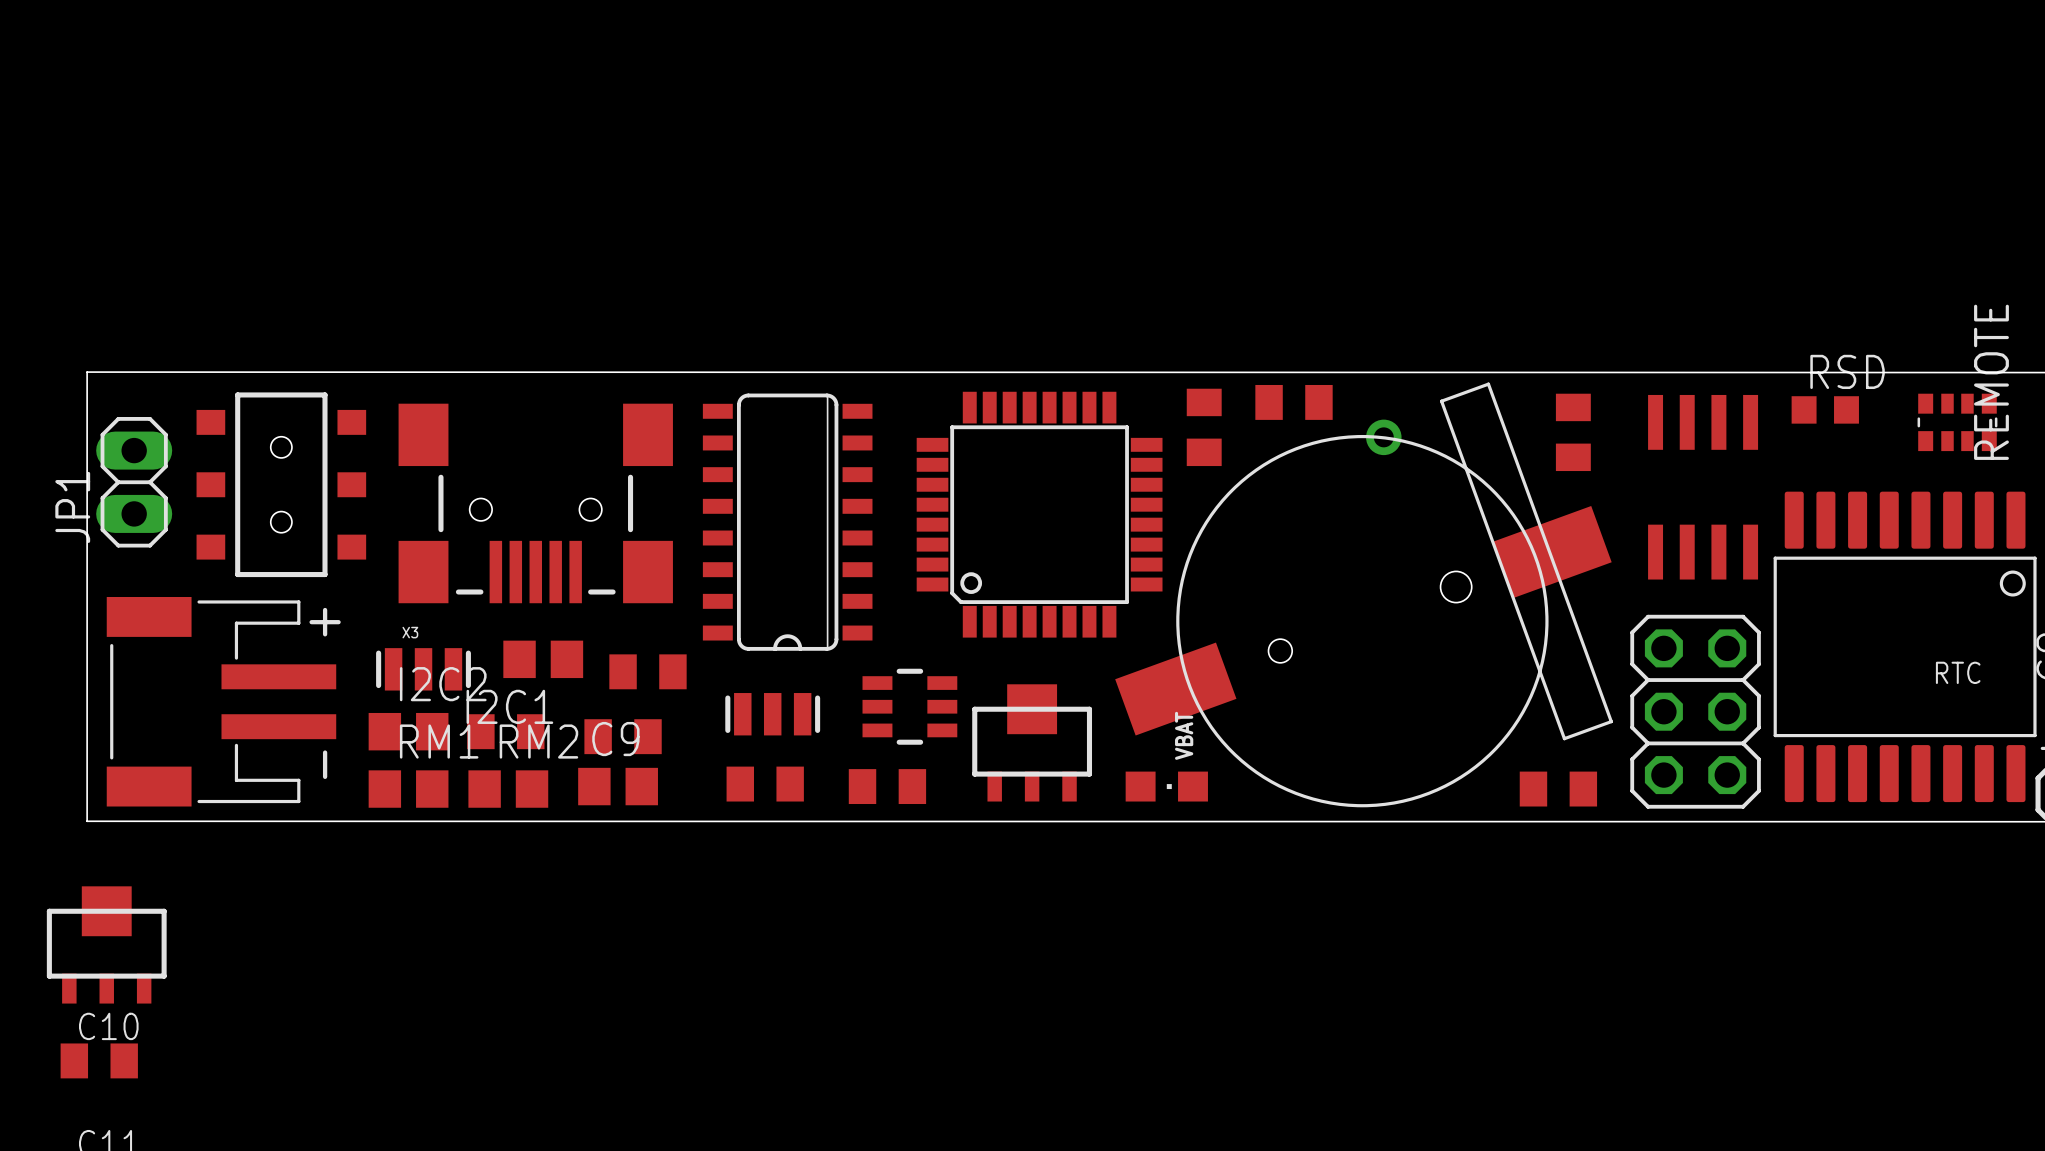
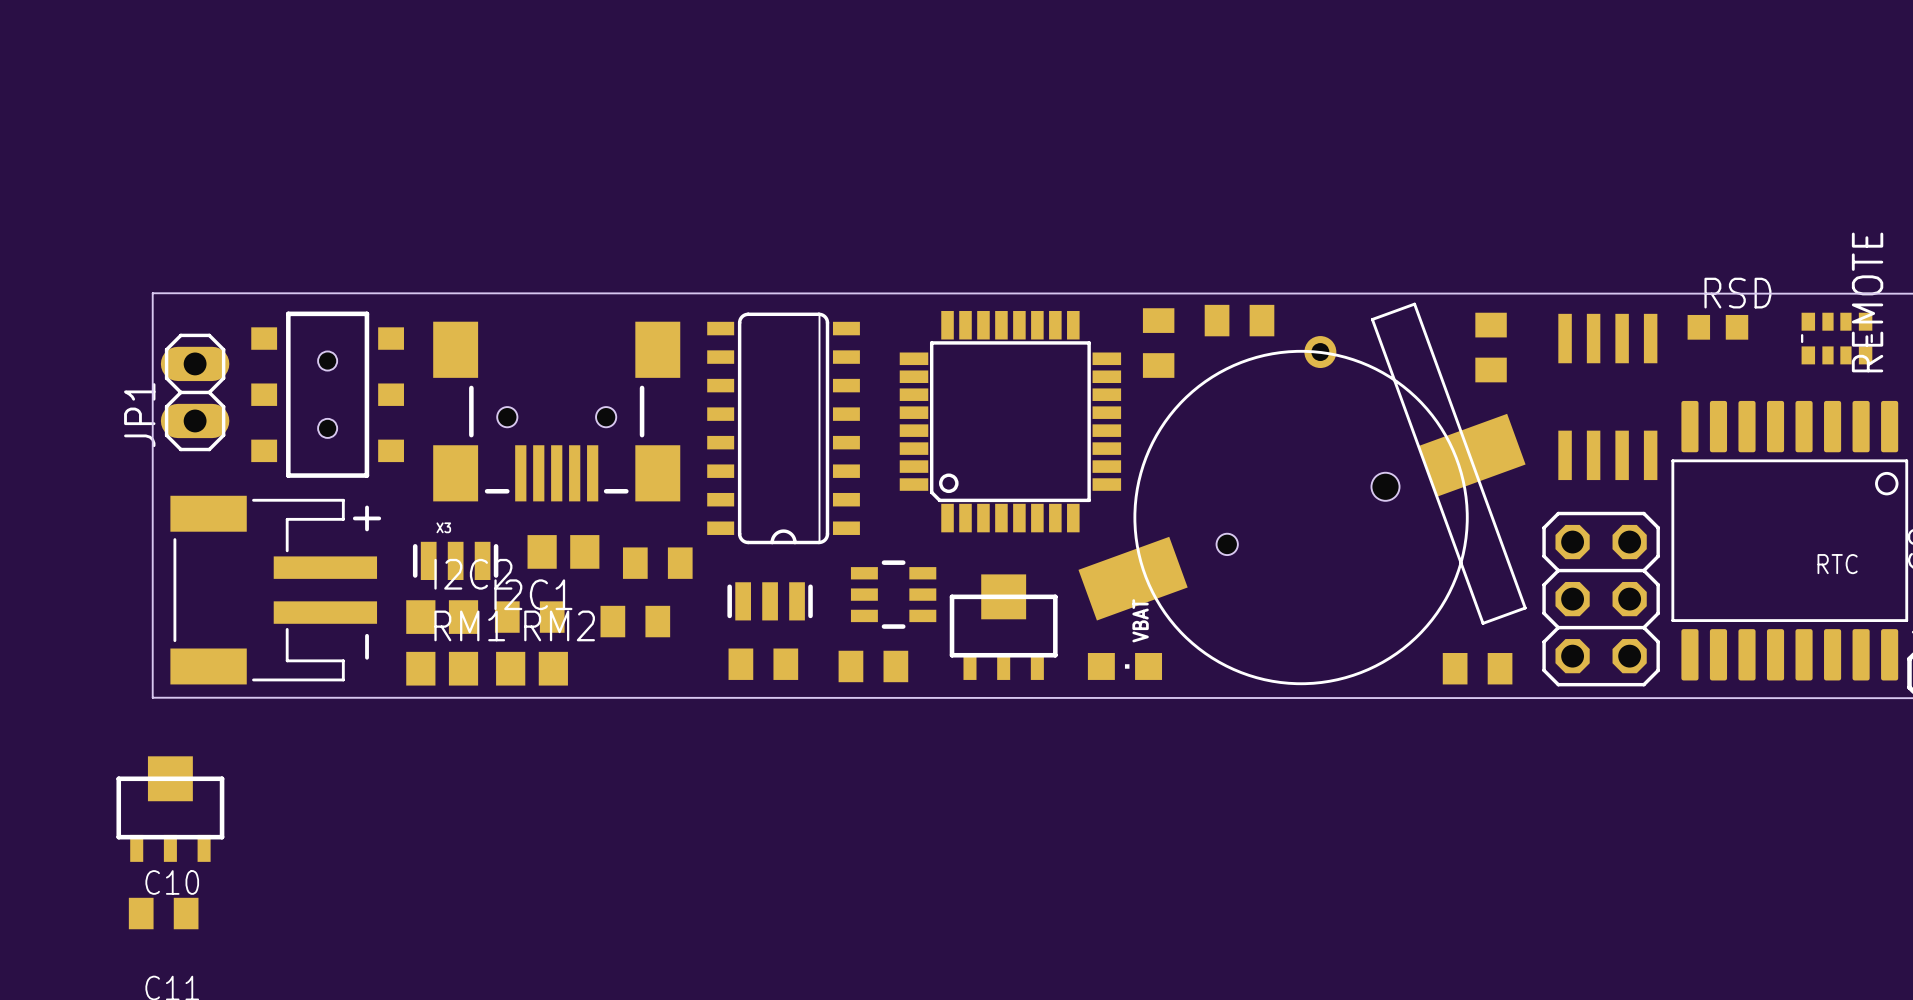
C9: (618, 786) -> none

